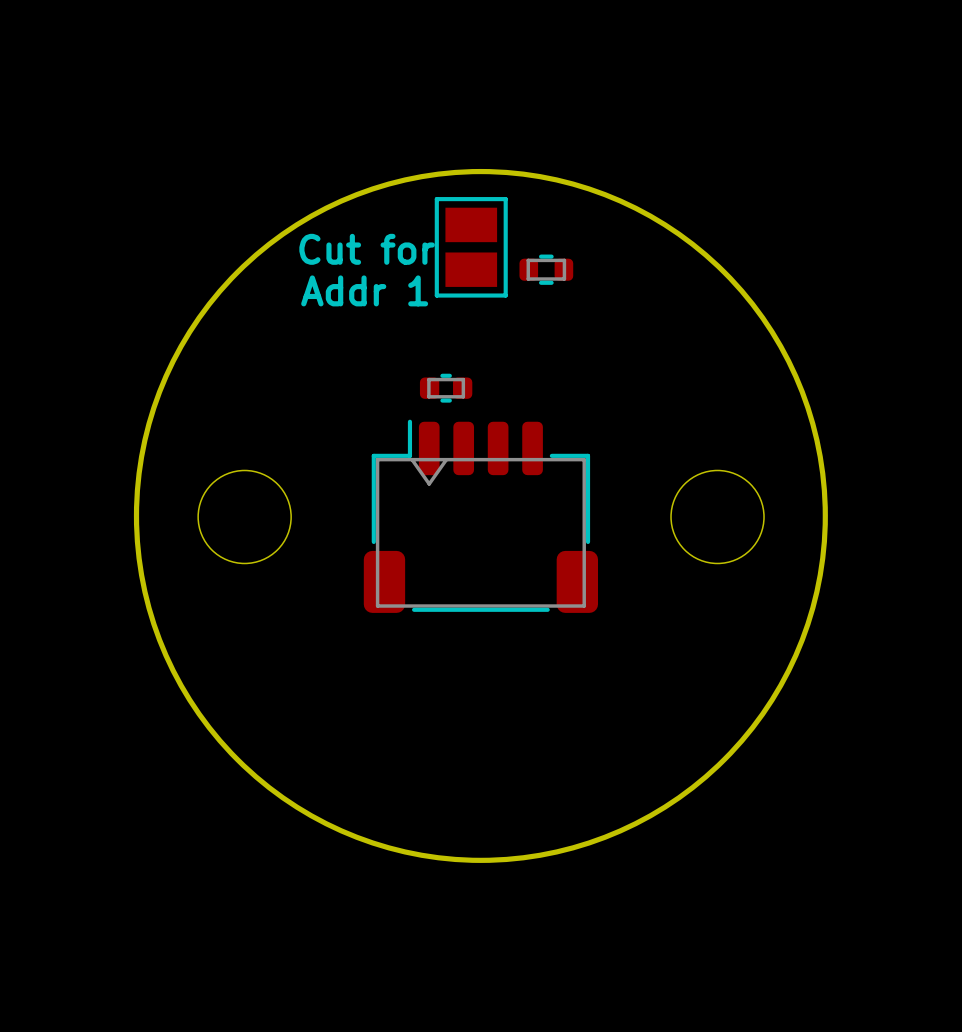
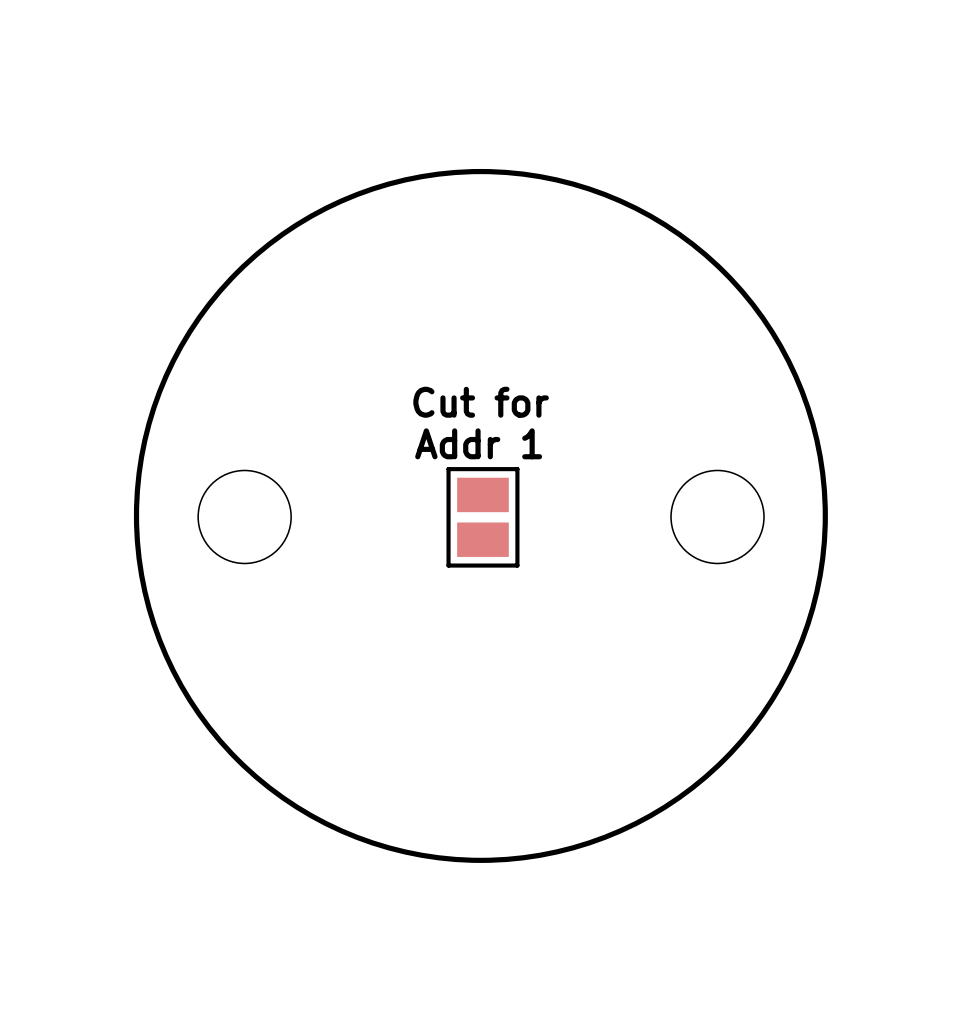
part: (471, 247) -> none
text position: Cut for (367, 249) -> Cut for (481, 402)
part: (546, 269) -> none
text position: Addr 1 (364, 290) -> Addr 1 (478, 443)
part: (446, 388) -> none
part footprint: [363, 419, 599, 613] -> [446, 467, 520, 568]

